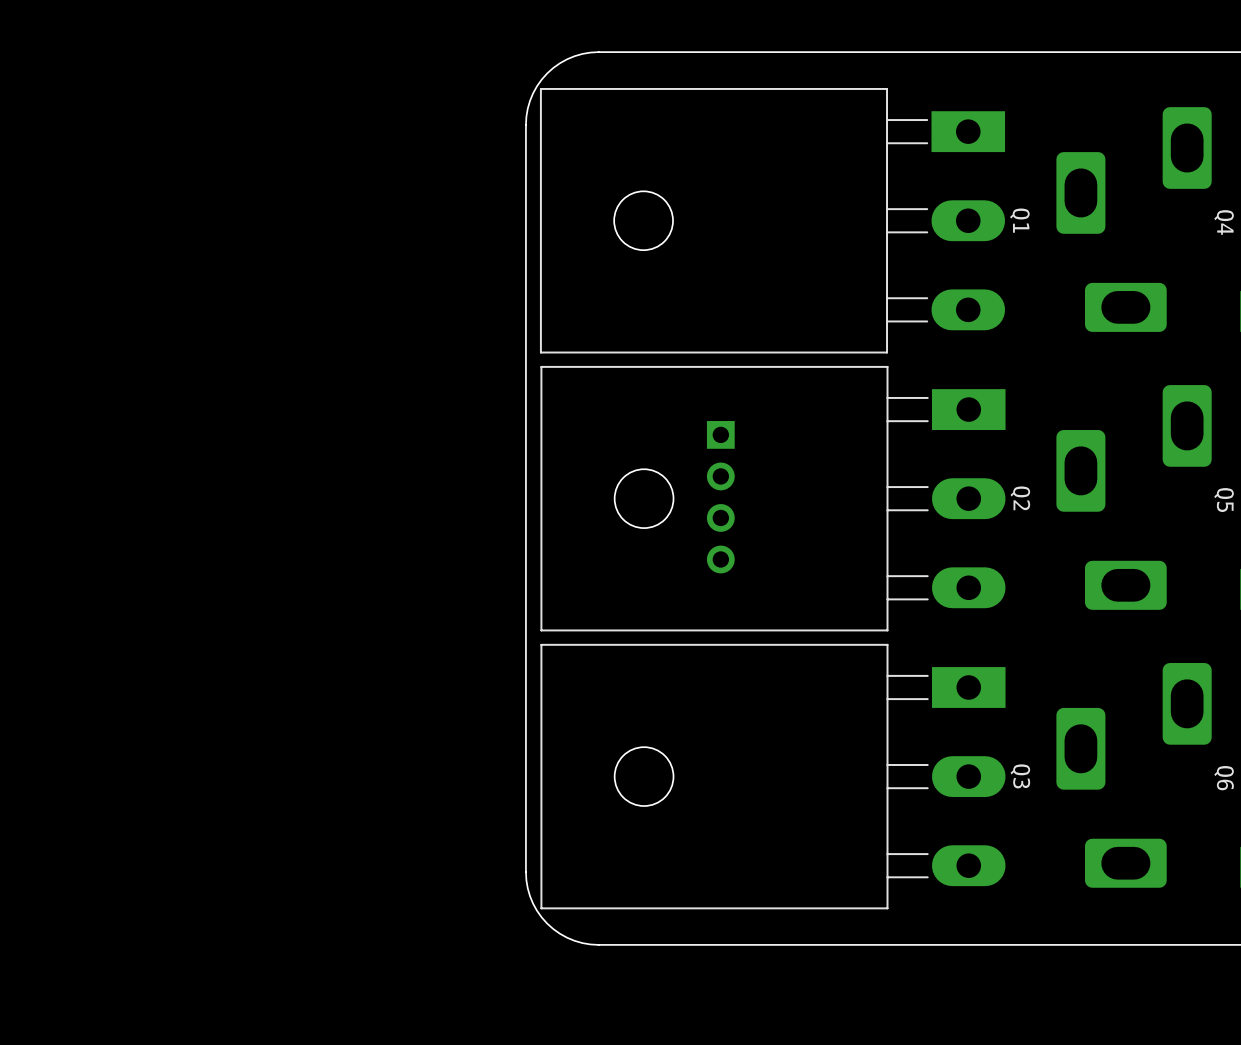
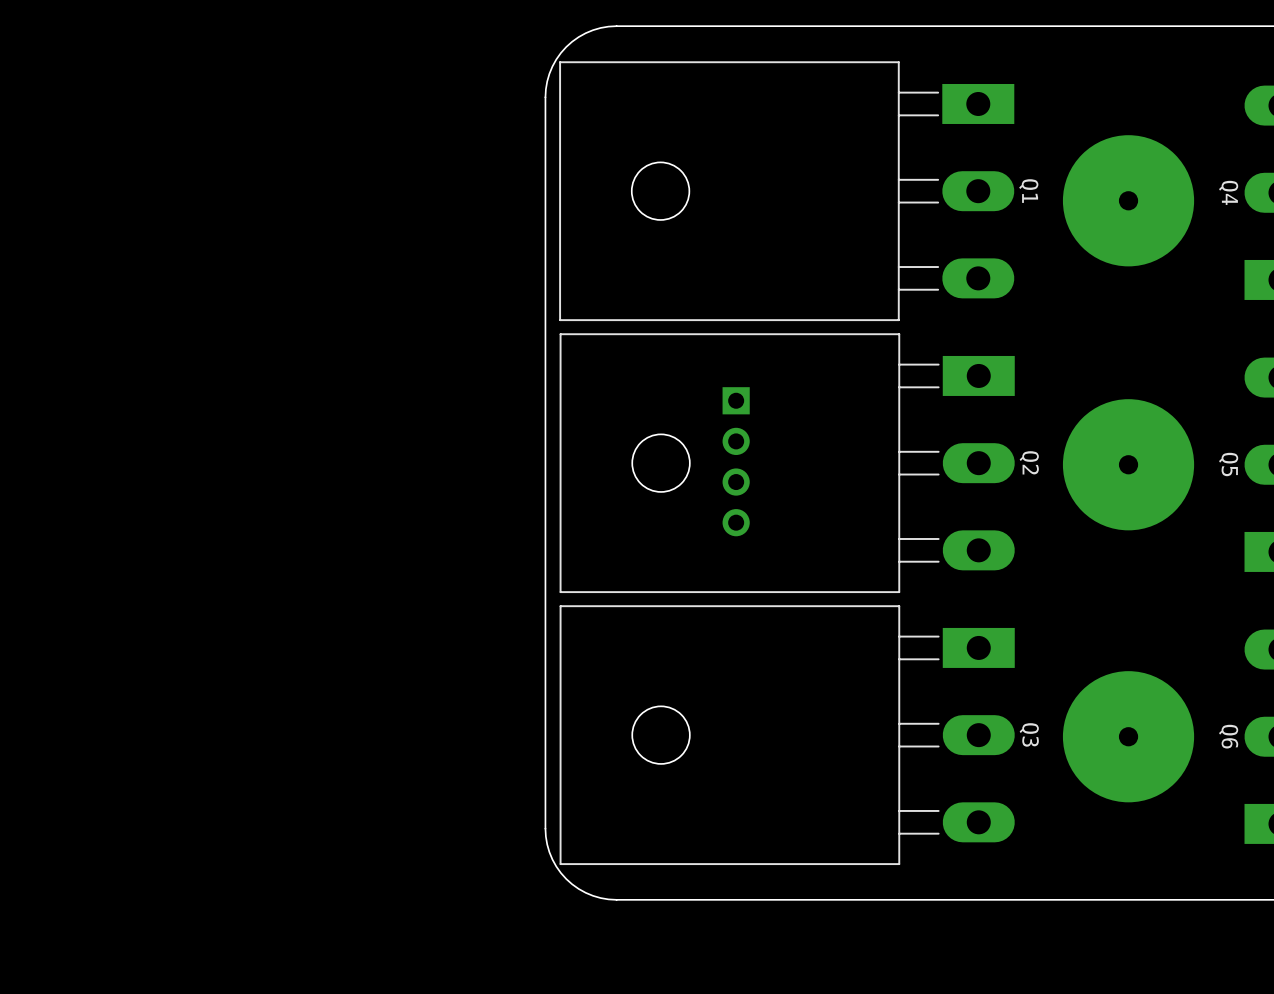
part: (1187, 147) -> none
part: (1080, 192) -> none
part: none -> (1128, 200)
part: (1125, 307) -> none
part: (1187, 425) -> none
part: (1080, 470) -> none
part: none -> (1128, 464)
part: (1125, 585) -> none
part: (1187, 703) -> none
part: (1080, 748) -> none
part: none -> (1128, 736)
part: (1125, 863) -> none

